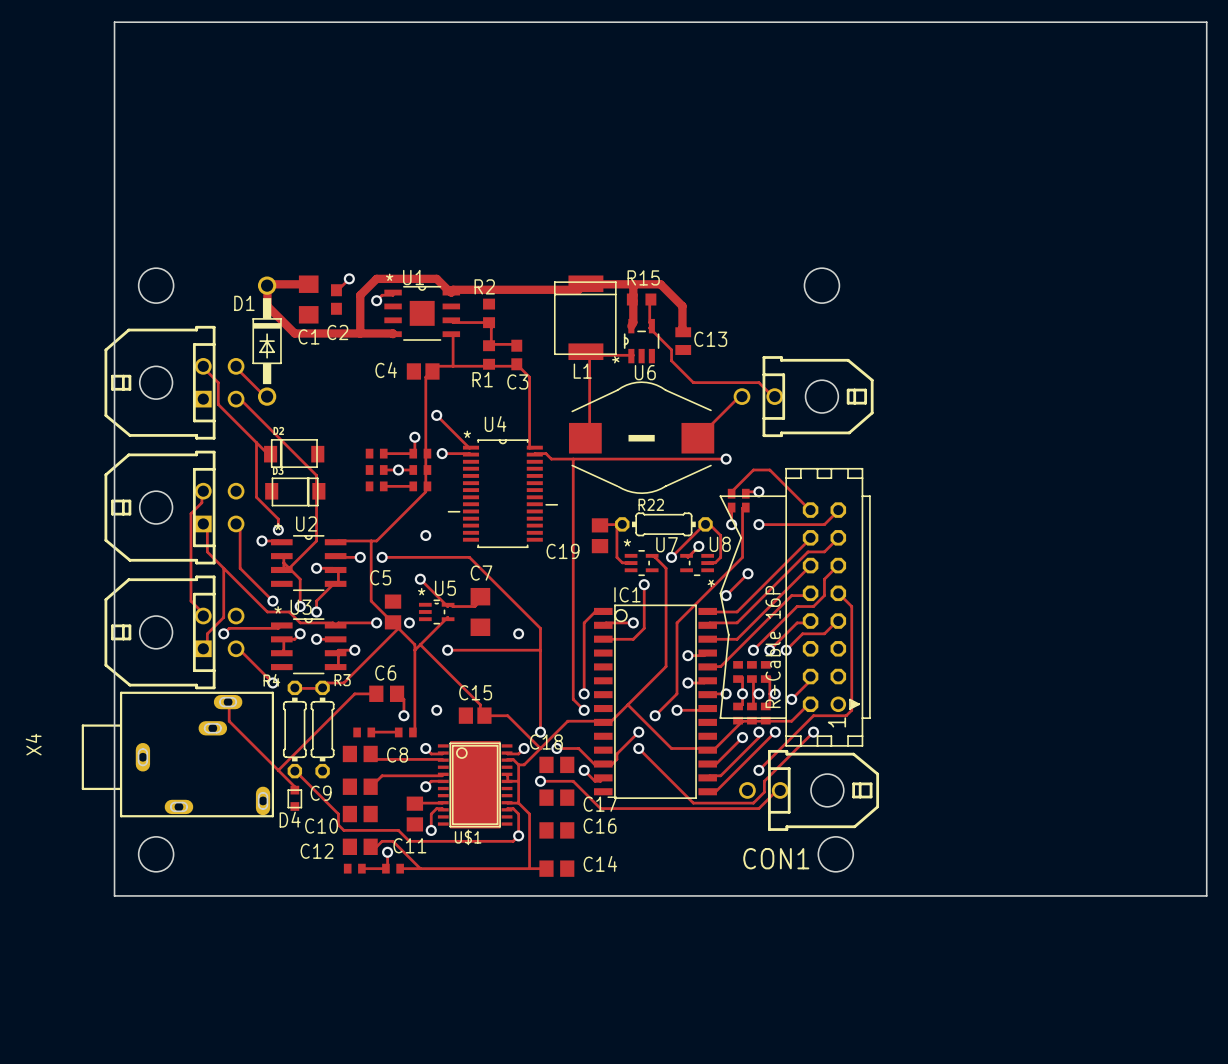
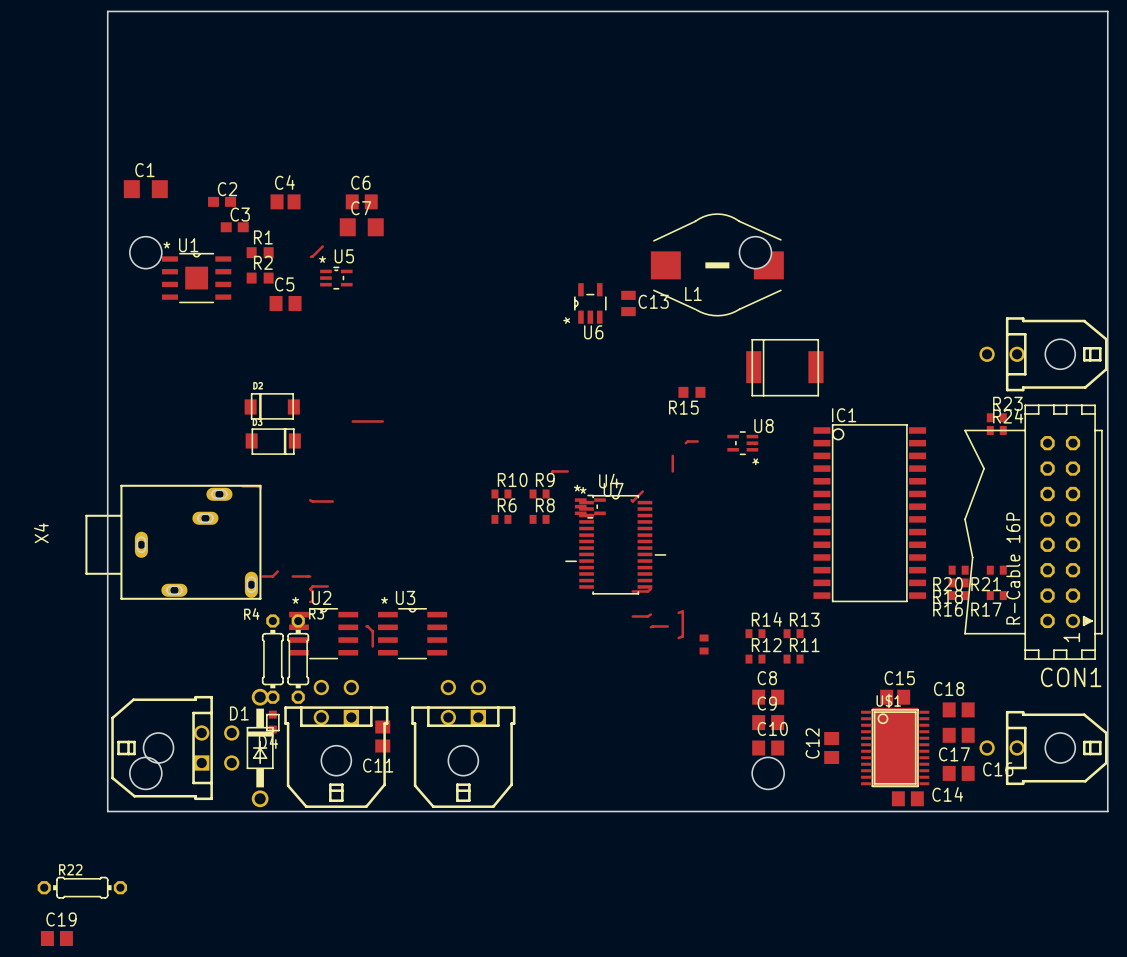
R15 name position: R15 (643, 277) -> R15 (683, 407)
via: (349, 278) -> none
track: (308, 284) (267, 284) (267, 306) (294, 333) (393, 334) -> none
track: (633, 284) (633, 322) (631, 326) -> none
track: (393, 292) (393, 295) (382, 295) (376, 300) -> none
C1 rotation: 0° (308, 299) -> 90° clockwise (145, 189)
C1 position: (308, 299) -> (145, 189)
C2 rotation: 0° (336, 299) -> 90° clockwise (222, 201)
C2 position: (336, 299) -> (222, 201)
R15 position: (641, 299) -> (691, 392)
track: (650, 299) (649, 322) (651, 326) (649, 328) (671, 349) (671, 360) (693, 382) (758, 382) (774, 396) -> none
via: (376, 300) -> none
U1 position: (422, 313) -> (196, 278)
R2 rotation: 0° (489, 313) -> 90° clockwise (260, 278)
R2 position: (489, 313) -> (260, 278)
part: (585, 317) -> none
track: (451, 320) (453, 322) (489, 322) (491, 328) (491, 344) -> none
C2 name position: C2 (337, 332) -> C2 (227, 189)
track: (683, 332) (682, 306) (660, 284) (585, 283) (578, 289) (453, 289) (451, 292) (436, 278) (376, 278) (360, 295) (360, 333) -> none
track: (451, 334) (453, 333) (453, 366) -> none
C1 name position: C1 (308, 336) -> C1 (144, 170)
D1 position: (267, 341) -> (260, 748)
track: (491, 344) (516, 345) -> none
R1 rotation: 0° (489, 354) -> 90° clockwise (260, 252)
R1 position: (489, 354) -> (260, 252)
C3 rotation: 0° (516, 354) -> 90° clockwise (234, 227)
C3 position: (516, 354) -> (234, 227)
track: (589, 355) (633, 355) (631, 356) -> none
track: (589, 355) (589, 437) (585, 438) -> none
track: (203, 366) (218, 382) (218, 404) (267, 453) (270, 454) -> none
track: (236, 366) (267, 396) -> none
C4 name position: C4 (386, 370) -> C4 (284, 182)
C4 position: (423, 371) -> (285, 201)
L1 name position: L1 (582, 371) -> L1 (693, 293)
R1 name position: R1 (482, 379) -> R1 (263, 237)
C3 name position: C3 (517, 381) -> C3 (240, 214)
part: (174, 382) -> none
track: (741, 396) (737, 399) (697, 438) -> none
part: (803, 396) -> none
part: none -> (1043, 354)
track: (236, 399) (240, 399) (316, 475) (316, 486) (318, 491) (316, 491) (316, 540) (289, 568) (281, 569) (283, 568) (283, 557) (281, 556) -> none
part: none -> (784, 367)
track: (436, 415) (471, 447) -> none
via: (436, 415) -> none
track: (414, 437) (414, 453) (382, 453) -> none
via: (414, 437) -> none
L1 position: (641, 437) -> (717, 264)
track: (256, 442) (256, 497) (278, 519) (278, 530) -> none
track: (534, 447) (529, 448) (529, 377) (516, 364) (513, 366) (491, 366) (489, 364) (485, 366) (436, 366) (425, 377) (425, 491) (376, 540) (335, 542) -> none
part: (376, 453) -> none
part: (420, 453) -> none
track: (442, 453) (471, 454) -> none
via: (442, 453) -> none
track: (534, 454) (545, 453) (551, 459) (726, 459) -> none
track: (573, 459) (573, 699) (584, 710) -> none
via: (726, 459) -> none
R23: none -> (996, 417)
part: (376, 470) -> none
via: (398, 470) -> none
part: (420, 470) -> none
R24: none -> (996, 430)
part: (376, 486) -> none
track: (382, 486) (414, 486) -> none
part: (420, 486) -> none
track: (203, 491) (201, 502) (190, 513) (190, 601) (203, 616) -> none
via: (758, 491) -> none
U4 position: (502, 493) -> (615, 544)
track: (731, 493) (753, 470) (769, 470) (810, 510) -> none
part: (738, 493) -> none
part: (174, 507) -> none
part: (738, 507) -> none
track: (745, 507) (742, 508) (742, 557) (677, 622) (677, 693) (655, 715) -> none
track: (838, 510) (824, 524) (758, 524) -> none
track: (203, 523) (207, 524) (207, 551) (267, 611) (289, 611) (300, 622) (332, 622) (335, 625) (338, 622) (376, 622) -> none
track: (236, 523) (240, 524) (240, 568) (272, 601) -> none
track: (622, 524) (616, 524) (616, 557) (622, 562) (631, 563) -> none
R22 position: (663, 524) -> (82, 887)
via: (731, 524) -> none
via: (758, 524) -> none
via: (278, 530) -> none
via: (425, 535) -> none
C19 rotation: 0° (600, 535) -> 90° clockwise (56, 938)
C19 position: (600, 535) -> (56, 938)
track: (810, 537) (737, 611) (707, 611) -> none
track: (838, 537) (824, 551) (808, 551) (737, 622) (709, 622) (707, 625) -> none
via: (261, 540) -> none
track: (371, 540) (371, 601) (414, 644) (414, 732) (412, 732) -> none
via: (698, 546) -> none
R10: none -> (501, 493)
R9: none -> (539, 493)
C19 name position: C19 (563, 551) -> C19 (61, 919)
track: (652, 555) (666, 568) (666, 666) (611, 721) (567, 721) (524, 764) (518, 764) -> none
via: (360, 557) -> none
track: (382, 557) (469, 557) (540, 628) (540, 732) -> none
via: (382, 557) -> none
track: (671, 557) (704, 524) (709, 524) (720, 535) (720, 557) (715, 562) (707, 563) -> none
via: (671, 557) -> none
track: (283, 562) (300, 579) (300, 606) -> none
U2 position: (308, 563) -> (323, 633)
U8 position: (697, 563) -> (742, 443)
track: (810, 565) (737, 639) (707, 639) -> none
track: (838, 565) (824, 579) (824, 595) (813, 606) (797, 606) (753, 650) -> none
track: (223, 568) (223, 617) (207, 633) (207, 644) (203, 648) -> none
track: (316, 568) (335, 569) (338, 568) (338, 584) (332, 584) (316, 601) (316, 611) -> none
via: (316, 568) -> none
track: (748, 573) (726, 595) -> none
via: (748, 573) -> none
R6: none -> (501, 519)
R8: none -> (539, 519)
track: (420, 579) (447, 606) (448, 604) (474, 606) (480, 601) (480, 596) -> none
via: (420, 579) -> none
track: (644, 584) (644, 628) (633, 639) (603, 639) -> none
via: (644, 584) -> none
track: (810, 593) (808, 595) (791, 595) (720, 666) (707, 666) -> none
track: (838, 593) (851, 606) (851, 710) (846, 715) (813, 715) (758, 770) -> none
via: (726, 595) -> none
via: (272, 601) -> none
via: (300, 606) -> none
CON1 position: (795, 607) -> (1033, 532)
via: (316, 611) -> none
C5 rotation: 0° (393, 611) -> 90° clockwise (285, 303)
C5 position: (393, 611) -> (285, 303)
U5 position: (436, 611) -> (336, 278)
C7 rotation: 0° (480, 611) -> 90° clockwise (361, 227)
C7 position: (480, 611) -> (361, 227)
track: (603, 611) (595, 611) (584, 622) (584, 693) -> none
track: (448, 619) (447, 617) (414, 650) -> none
track: (810, 621) (797, 622) (769, 650) -> none
track: (838, 621) (824, 633) (802, 633) (786, 650) -> none
via: (376, 622) -> none
track: (393, 622) (398, 628) (343, 682) (327, 682) (322, 688) (294, 687) -> none
via: (409, 622) -> none
track: (633, 622) (606, 622) (603, 625) -> none
via: (633, 622) -> none
track: (281, 625) (278, 628) (229, 628) (223, 633) -> none
part: (174, 632) -> none
R20: none -> (958, 570)
R21: none -> (996, 570)
via: (223, 633) -> none
via: (300, 633) -> none
via: (518, 633) -> none
track: (281, 639) (283, 639) (283, 650) (281, 653) -> none
via: (316, 639) -> none
track: (420, 644) (480, 704) (480, 710) (484, 715) (507, 715) (540, 748) -> none
U3 position: (308, 646) -> (412, 633)
R18: none -> (958, 582)
track: (236, 648) (240, 650) (272, 682) -> none
via: (354, 650) -> none
track: (447, 650) (540, 650) -> none
via: (447, 650) -> none
via: (753, 650) -> none
via: (769, 650) -> none
via: (786, 650) -> none
via: (687, 655) -> none
R16: none -> (958, 595)
R17: none -> (996, 595)
part: (738, 671) -> none
part: (751, 671) -> none
part: (765, 671) -> none
track: (810, 676) (813, 677) (791, 699) -> none
track: (751, 679) (753, 677) (751, 706) -> none
track: (765, 679) (769, 677) (769, 704) (765, 706) -> none
via: (272, 682) -> none
via: (687, 682) -> none
C15 name position: C15 (475, 692) -> C15 (899, 678)
track: (376, 693) (354, 693) (278, 770) -> none
C6 position: (386, 693) -> (361, 201)
via: (584, 693) -> none
via: (726, 693) -> none
via: (742, 693) -> none
via: (758, 693) -> none
via: (775, 693) -> none
via: (791, 699) -> none
IC1 position: (655, 701) -> (869, 513)
R14: none -> (755, 633)
R13: none -> (793, 633)
track: (228, 702) (229, 721) (294, 786) (294, 790) -> none
track: (627, 704) (671, 748) (707, 750) (715, 748) (742, 721) -> none
track: (810, 704) (791, 721) (742, 721) -> none
track: (707, 708) (704, 710) (677, 710) -> none
via: (436, 710) -> none
via: (584, 710) -> none
via: (677, 710) -> none
part: (738, 713) -> none
part: (751, 713) -> none
via: (403, 715) -> none
C15 position: (475, 715) -> (895, 697)
via: (655, 715) -> none
R12: none -> (755, 659)
R11: none -> (793, 659)
part: (364, 732) -> none
track: (371, 732) (398, 732) -> none
part: (405, 732) -> none
via: (540, 732) -> none
track: (638, 732) (616, 753) (616, 759) (611, 764) (595, 764) (578, 748) (556, 748) -> none
via: (638, 732) -> none
track: (758, 732) (758, 737) (720, 775) (709, 775) (707, 777) -> none
via: (758, 732) -> none
track: (775, 732) (715, 792) (707, 791) -> none
via: (775, 732) -> none
track: (813, 732) (764, 781) (764, 792) (753, 803) (693, 803) (638, 748) -> none
via: (813, 732) -> none
track: (742, 737) (715, 764) (707, 764) -> none
via: (742, 737) -> none
track: (425, 748) (431, 753) (443, 753) -> none
via: (425, 748) -> none
track: (524, 748) (518, 753) (507, 753) -> none
via: (524, 748) -> none
via: (556, 748) -> none
via: (638, 748) -> none
C8 position: (360, 753) -> (768, 697)
track: (370, 753) (376, 759) (443, 760) -> none
X4 position: (177, 754) -> (173, 542)
C8 name position: C8 (397, 755) -> C8 (767, 678)
track: (507, 760) (513, 759) (518, 764) -> none
track: (518, 764) (518, 803) -> none
C18 position: (556, 764) -> (958, 709)
track: (584, 770) (595, 781) (600, 781) (603, 777) -> none
via: (584, 770) -> none
via: (758, 770) -> none
track: (294, 771) (338, 814) (338, 824) (343, 830) (398, 830) (409, 841) (513, 841) (518, 835) (518, 814) (513, 808) (507, 809) -> none
track: (443, 774) (382, 775) (370, 786) -> none
track: (507, 774) (507, 781) -> none
track: (443, 781) (431, 781) (425, 786) -> none
track: (507, 781) (518, 781) -> none
track: (540, 781) (573, 781) (600, 808) (758, 808) (775, 792) (780, 790) -> none
via: (540, 781) -> none
U$1 position: (475, 784) -> (895, 747)
C9 position: (360, 786) -> (768, 722)
via: (425, 786) -> none
part: (809, 790) -> none
C9 name position: C9 (321, 793) -> C9 (767, 703)
C17 position: (556, 797) -> (958, 735)
track: (443, 802) (414, 803) -> none
track: (507, 802) (518, 803) -> none
track: (518, 803) (529, 814) (529, 868) -> none
C17 name position: C17 (600, 804) -> C17 (954, 754)
track: (443, 809) (436, 808) (431, 814) (431, 830) -> none
C10 position: (360, 814) -> (768, 748)
part: none -> (336, 743)
part: none -> (463, 743)
part: none -> (175, 748)
C10 name position: C10 (321, 826) -> C10 (772, 728)
part: none -> (1043, 748)
via: (431, 830) -> none
C16 position: (556, 830) -> (958, 773)
via: (518, 835) -> none
U$1 name position: U$1 (468, 837) -> U$1 (888, 700)
C12 rotation: 0° (360, 846) -> 90° clockwise (831, 748)
C12 position: (360, 846) -> (831, 748)
track: (370, 846) (376, 846) (382, 841) (393, 841) (420, 868) -> none
C12 name position: C12 (317, 851) -> C12 (812, 743)
track: (387, 852) (387, 868) (360, 868) -> none
via: (387, 852) -> none
CON1 name position: CON1 (776, 858) -> CON1 (1071, 677)
part: (354, 868) -> none
part: (393, 868) -> none
track: (398, 868) (546, 868) -> none
C14 position: (556, 868) -> (907, 798)

